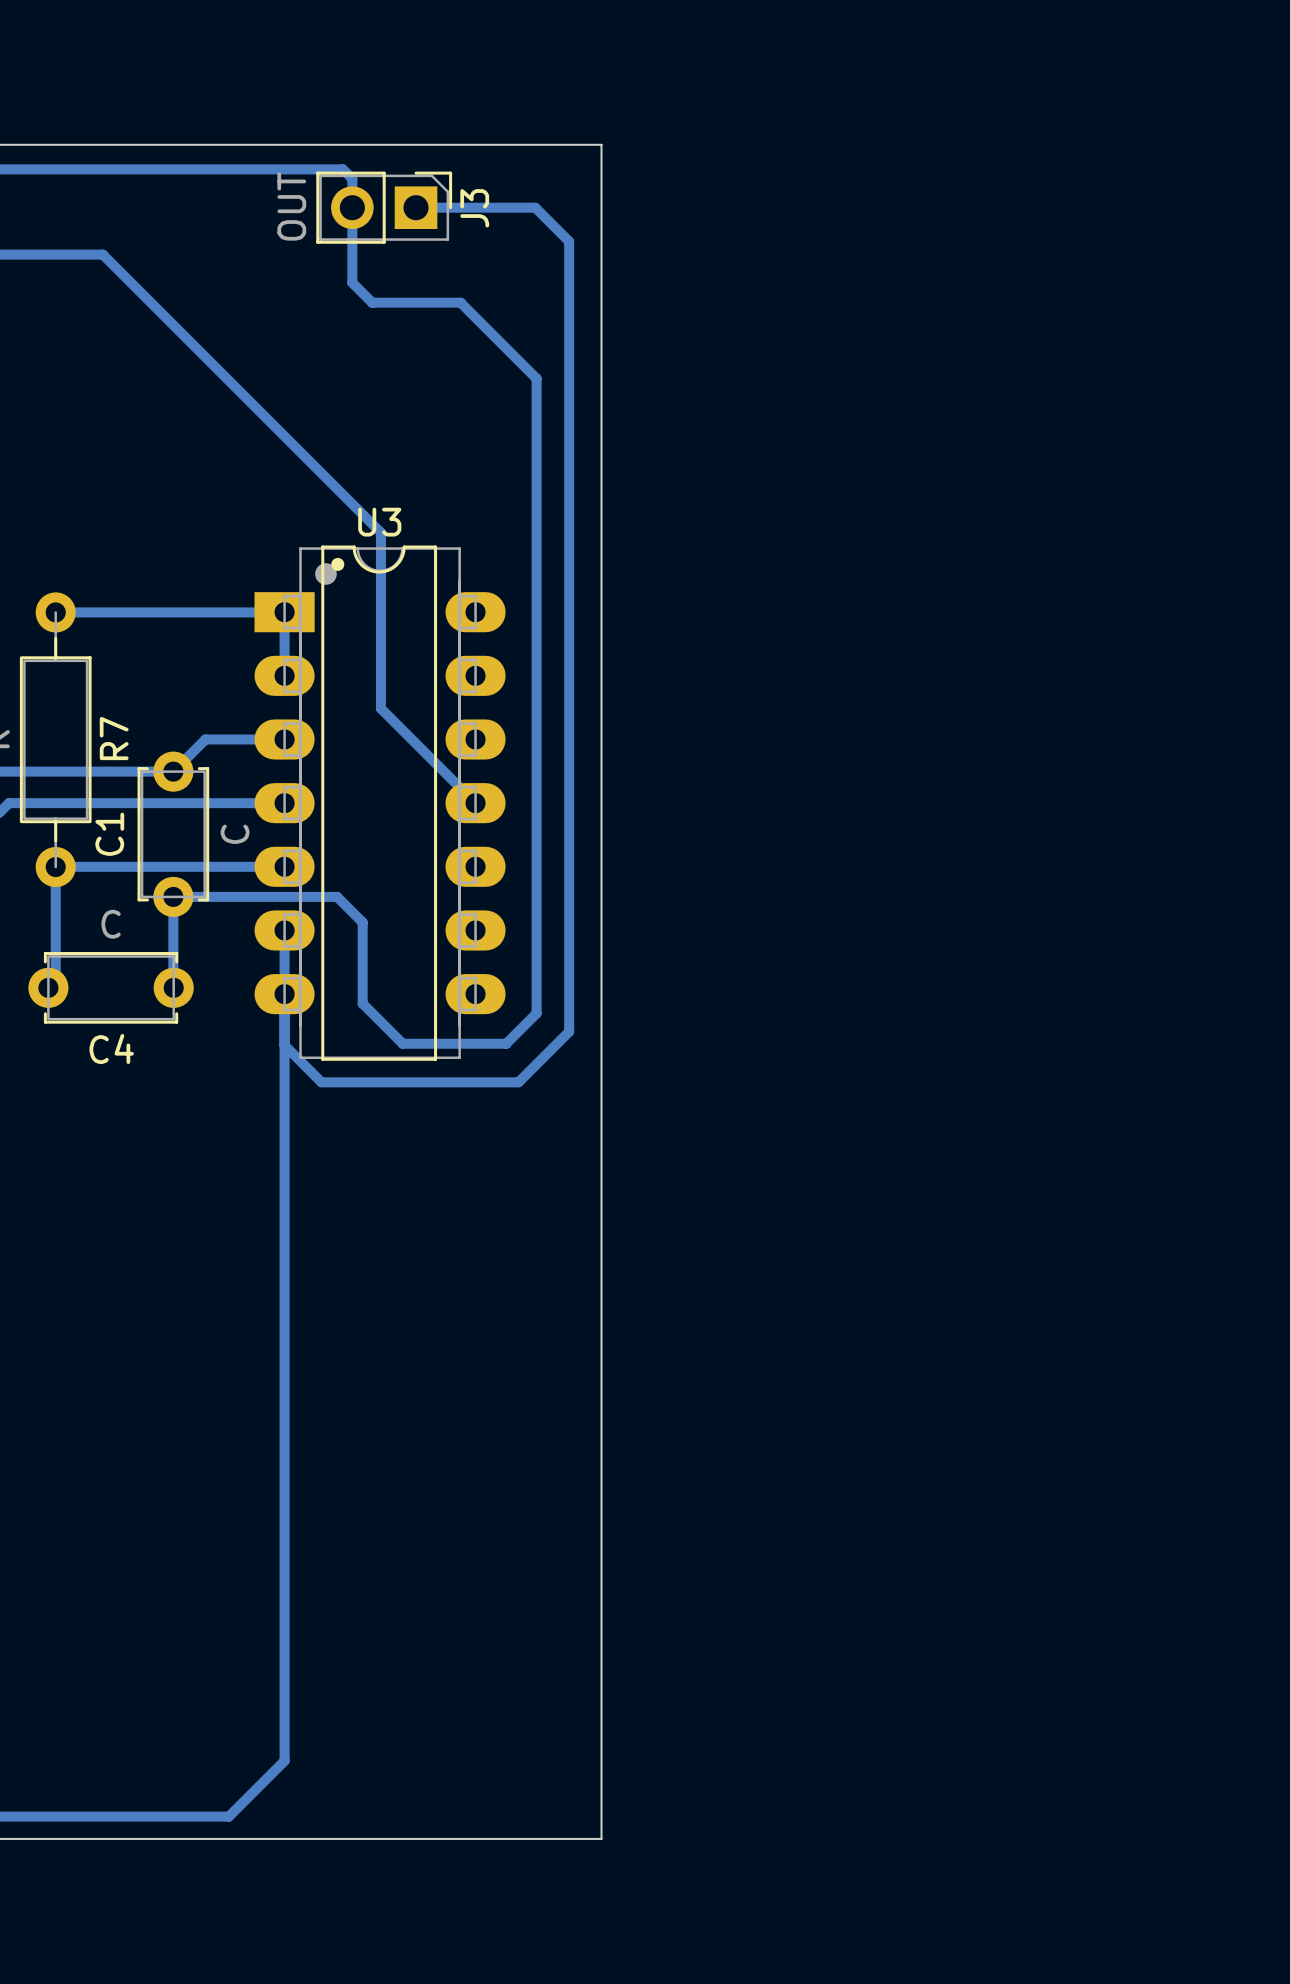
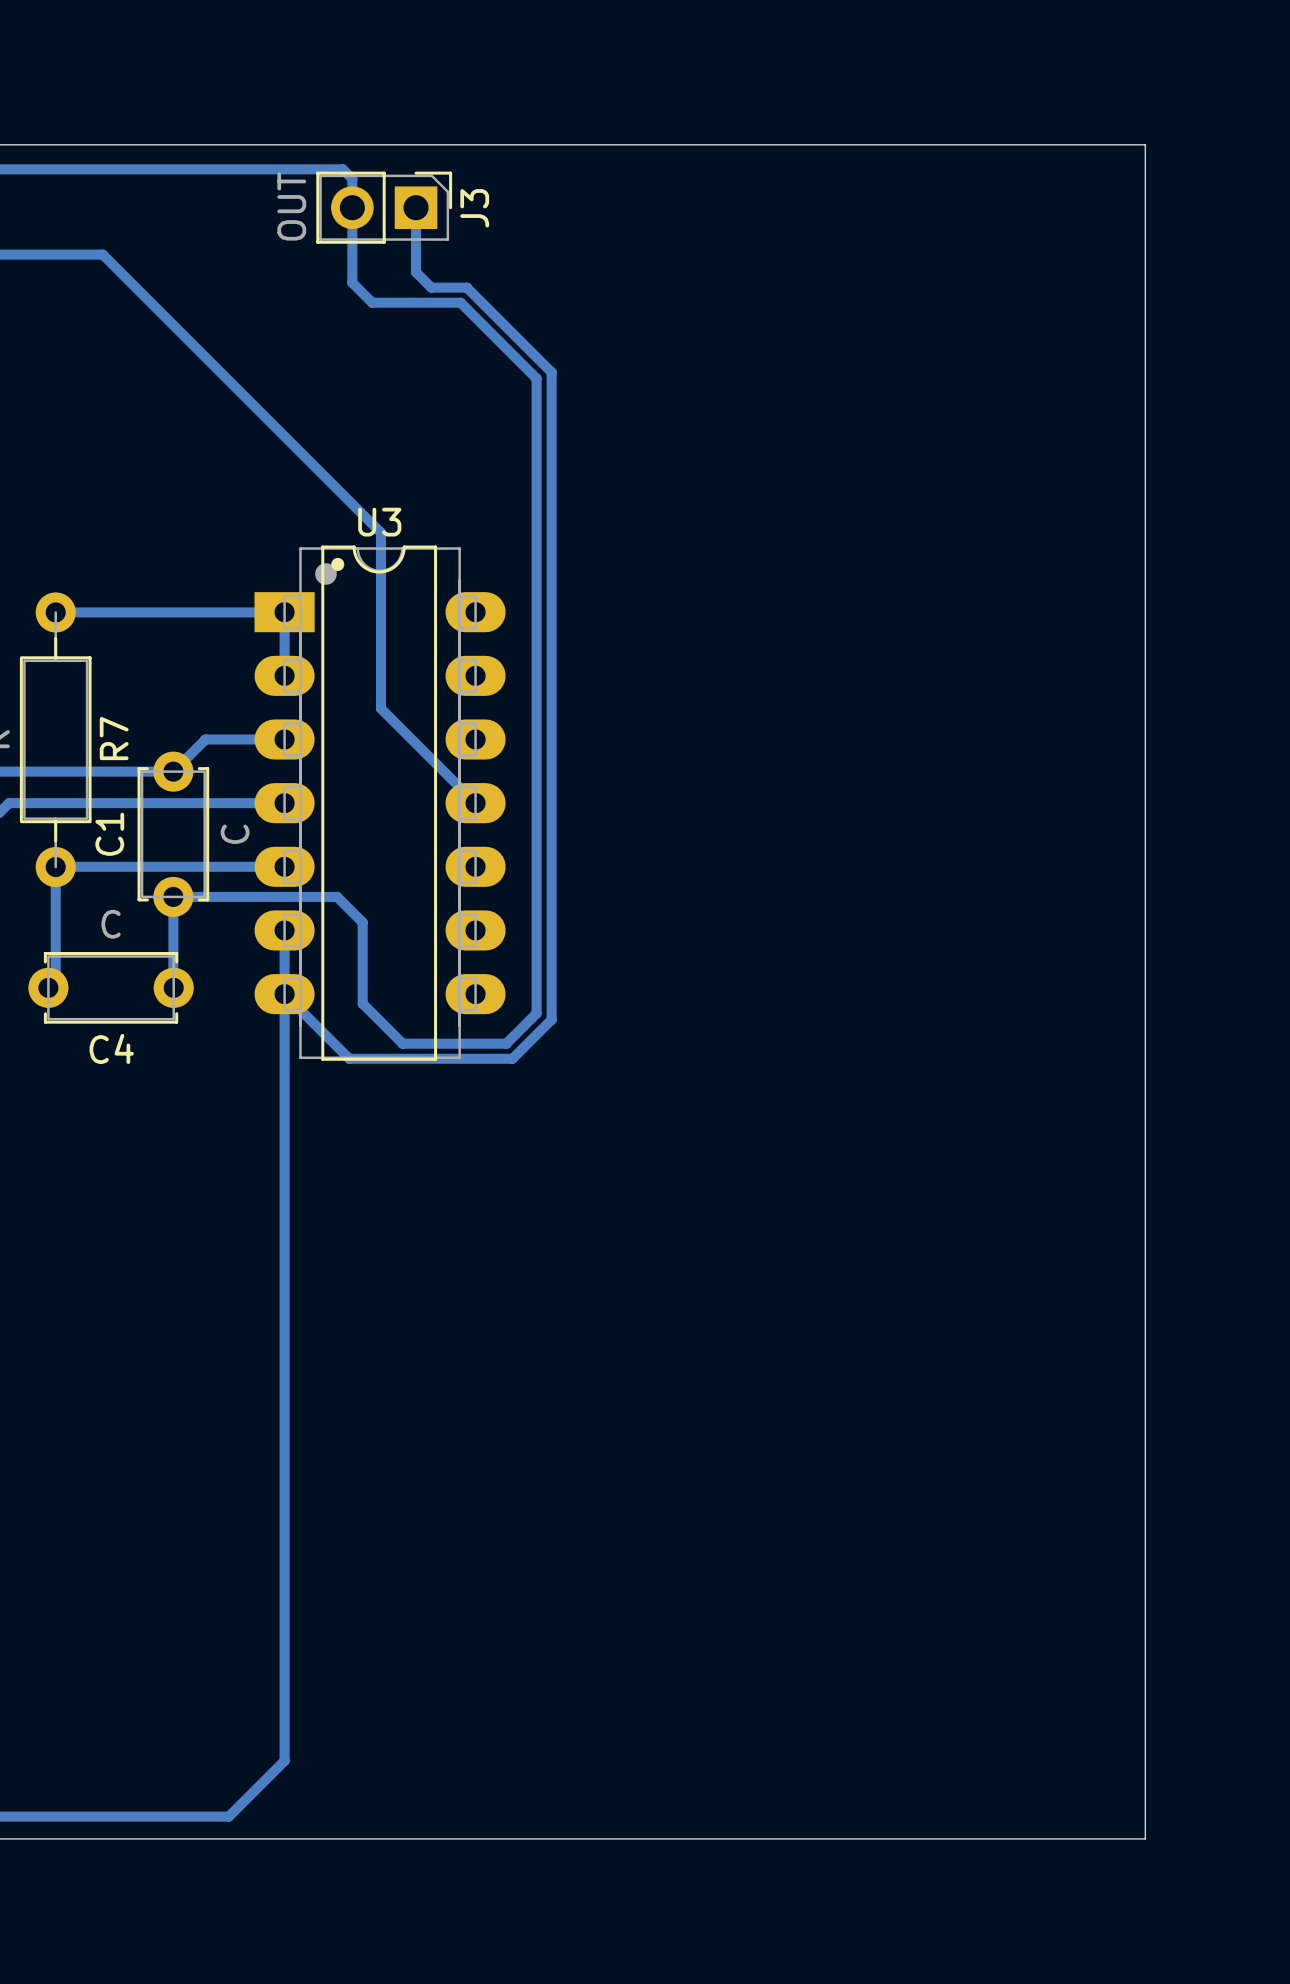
board edge: (601, 144) (601, 1838) -> (601, 144) (1145, 144) (1145, 1838) (601, 1838)
bottom track: (416, 207) (535, 207) (569, 241) (569, 1031) (518, 1082) (321, 1082) (284, 1045) -> (416, 207) (416, 272) (431, 287) (466, 287) (551, 372) (551, 1019) (512, 1058) (349, 1058) (284, 994)

